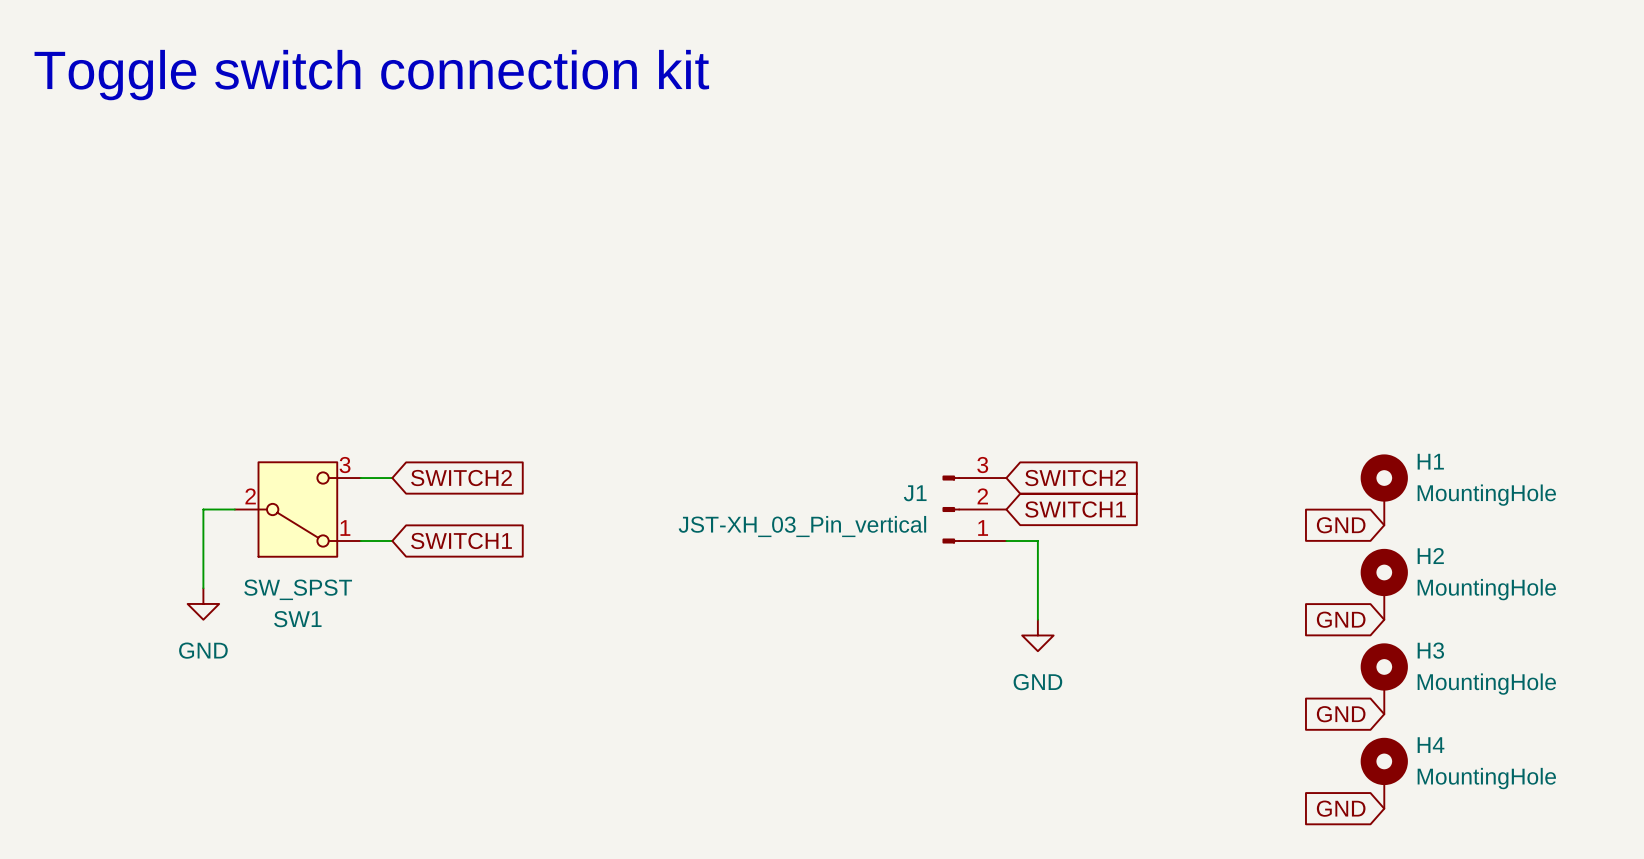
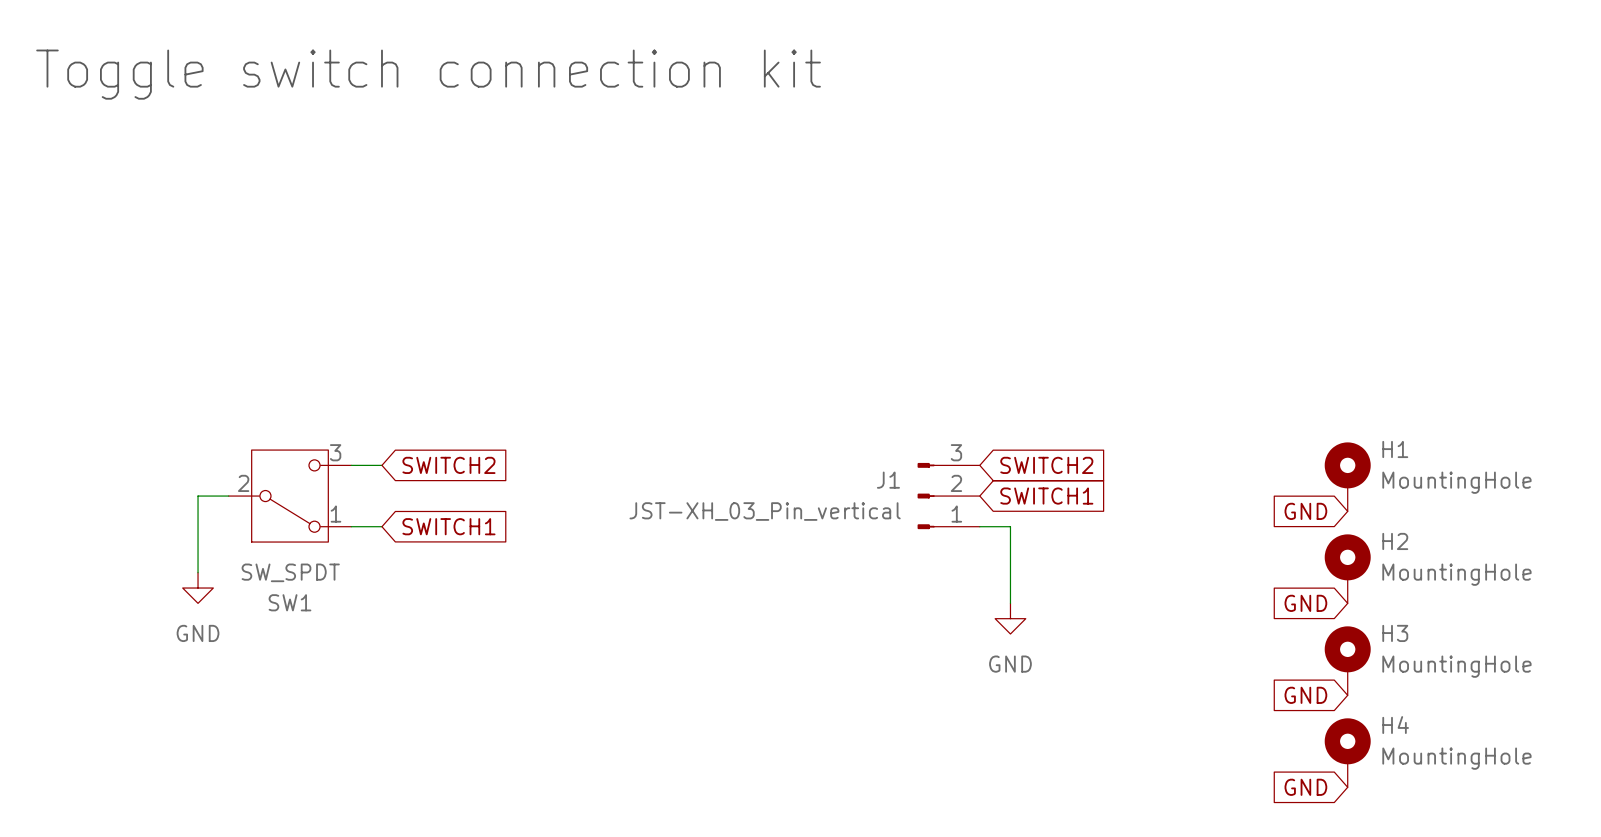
SW1 value: SW_SPST (298, 589) -> SW_SPDT (290, 572)

